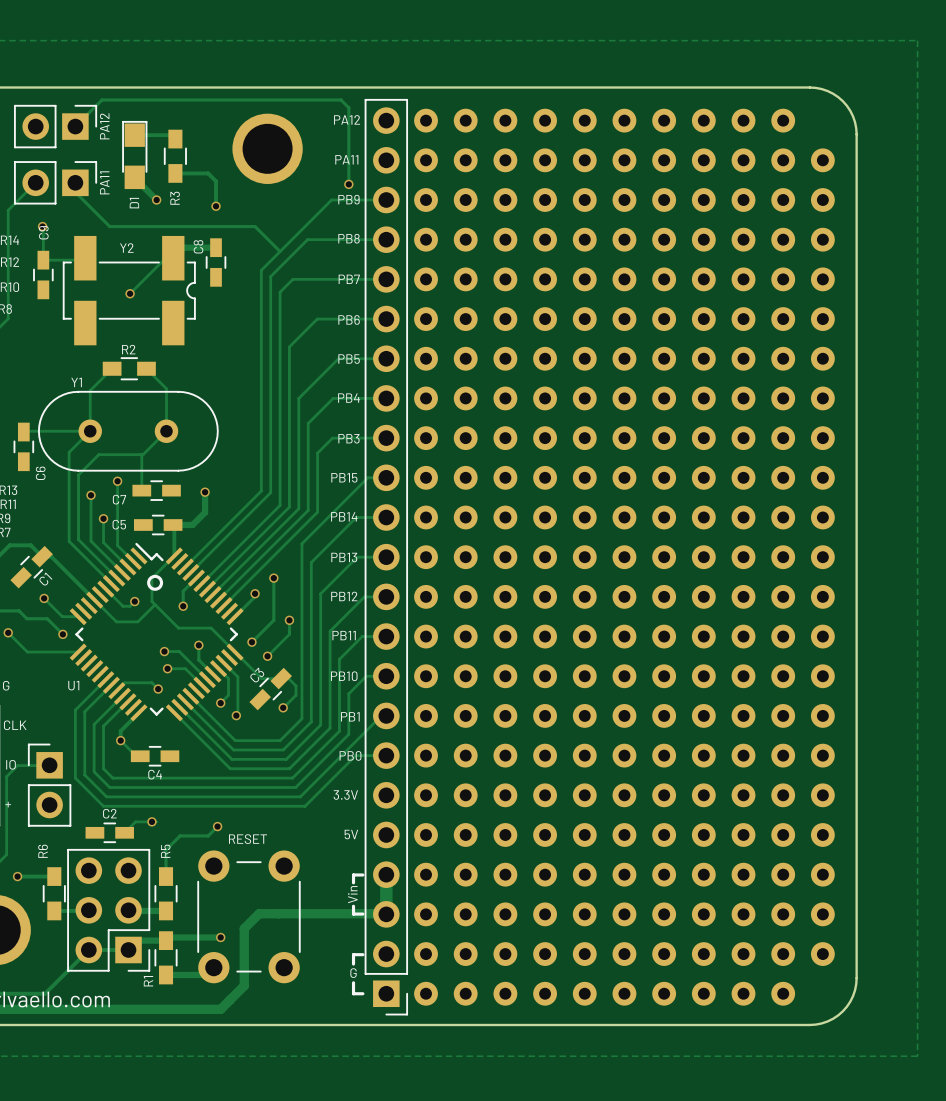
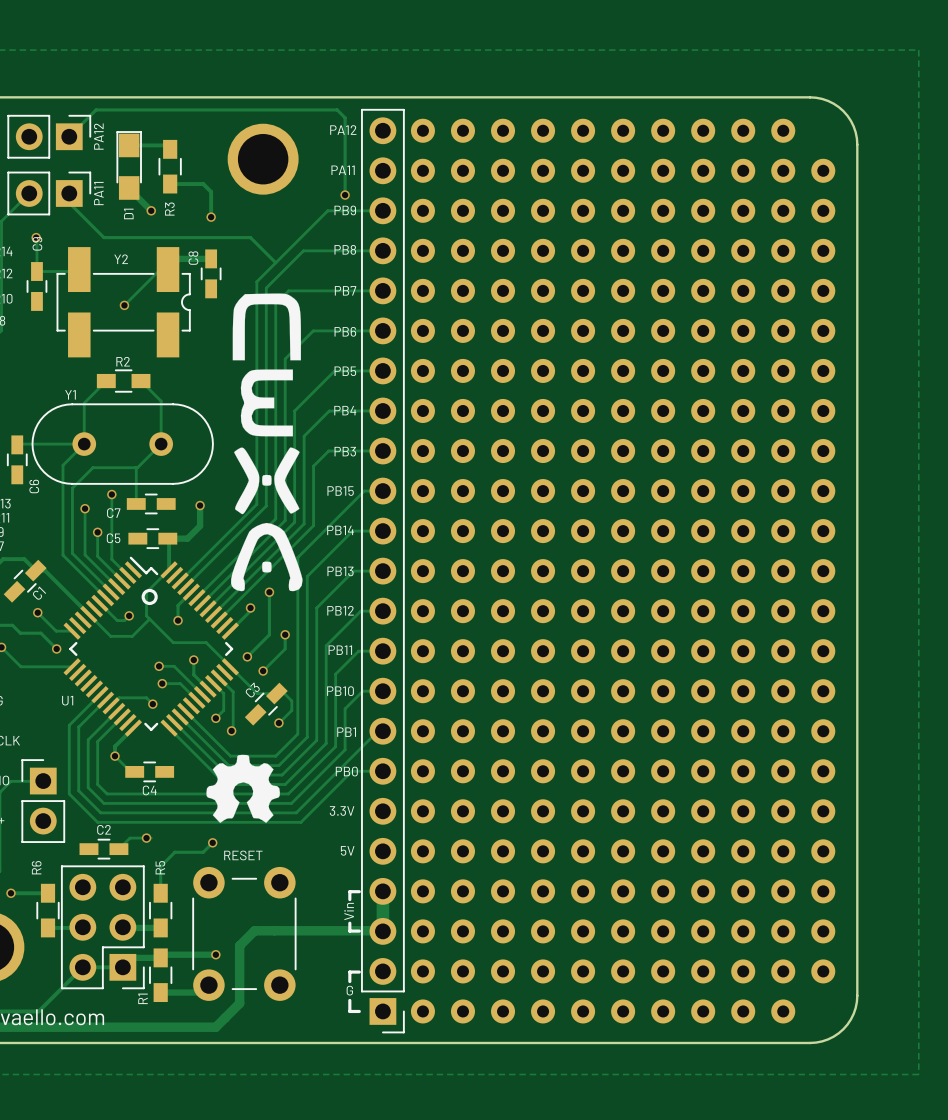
drawing: none -> [231, 293, 303, 592]
drawing: none -> [206, 754, 280, 823]

